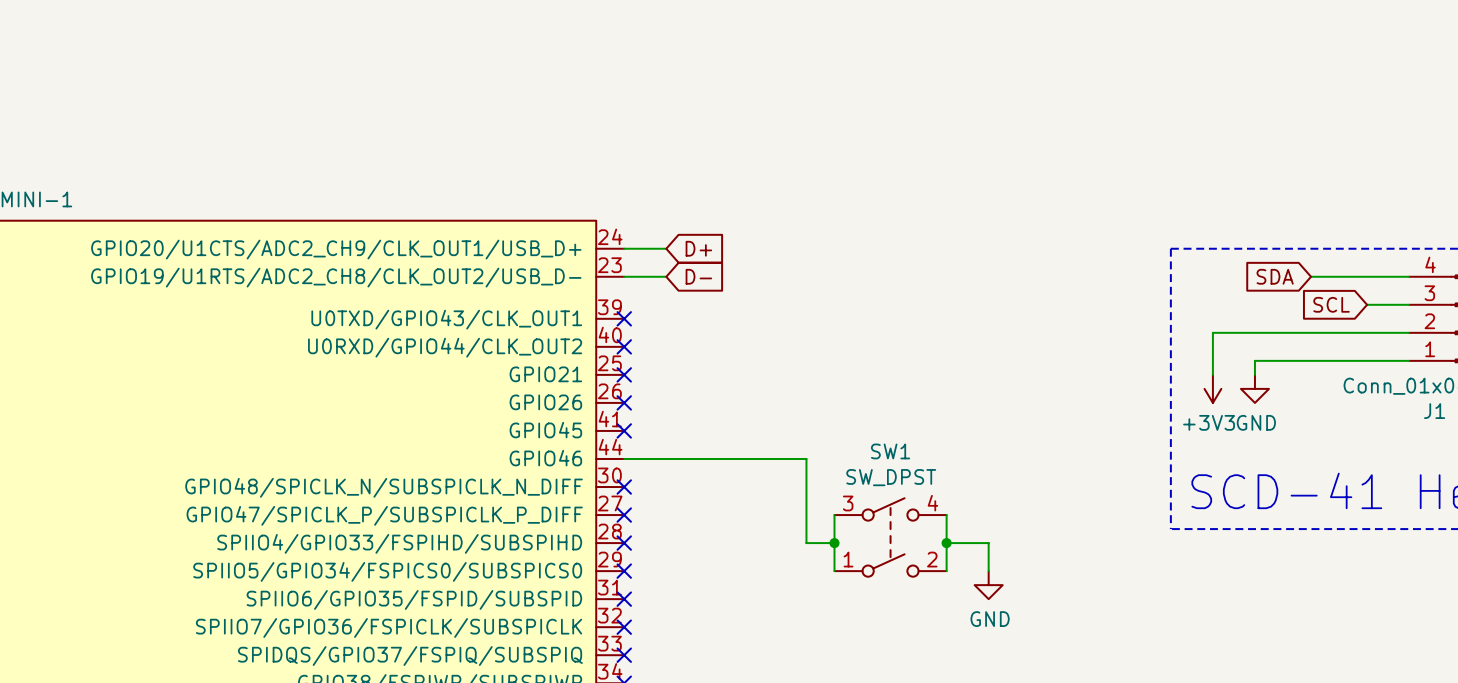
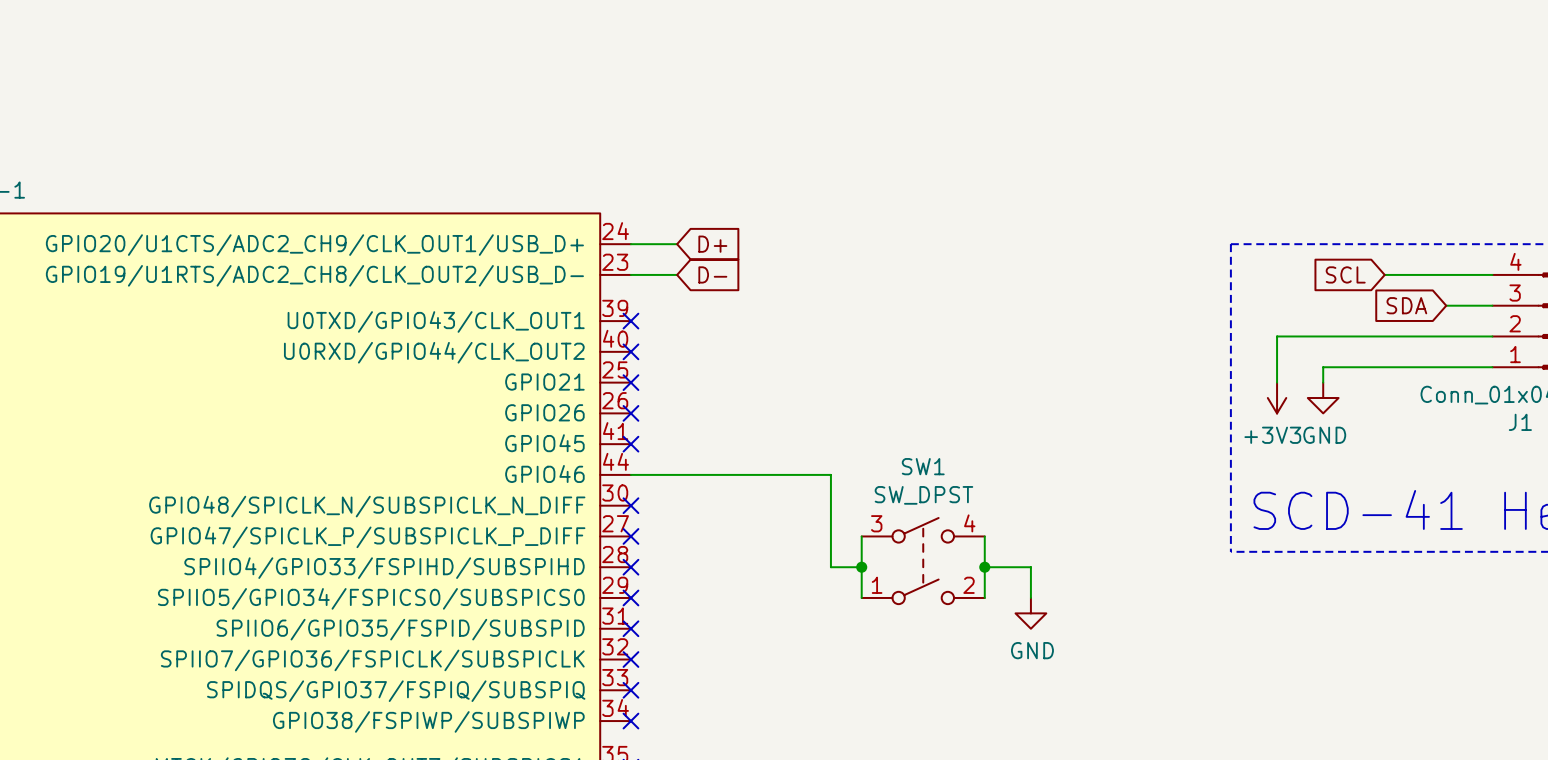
global label: SDA (1275, 276) -> SCL (1345, 274)
global label: SCL (1331, 304) -> SDA (1406, 305)

